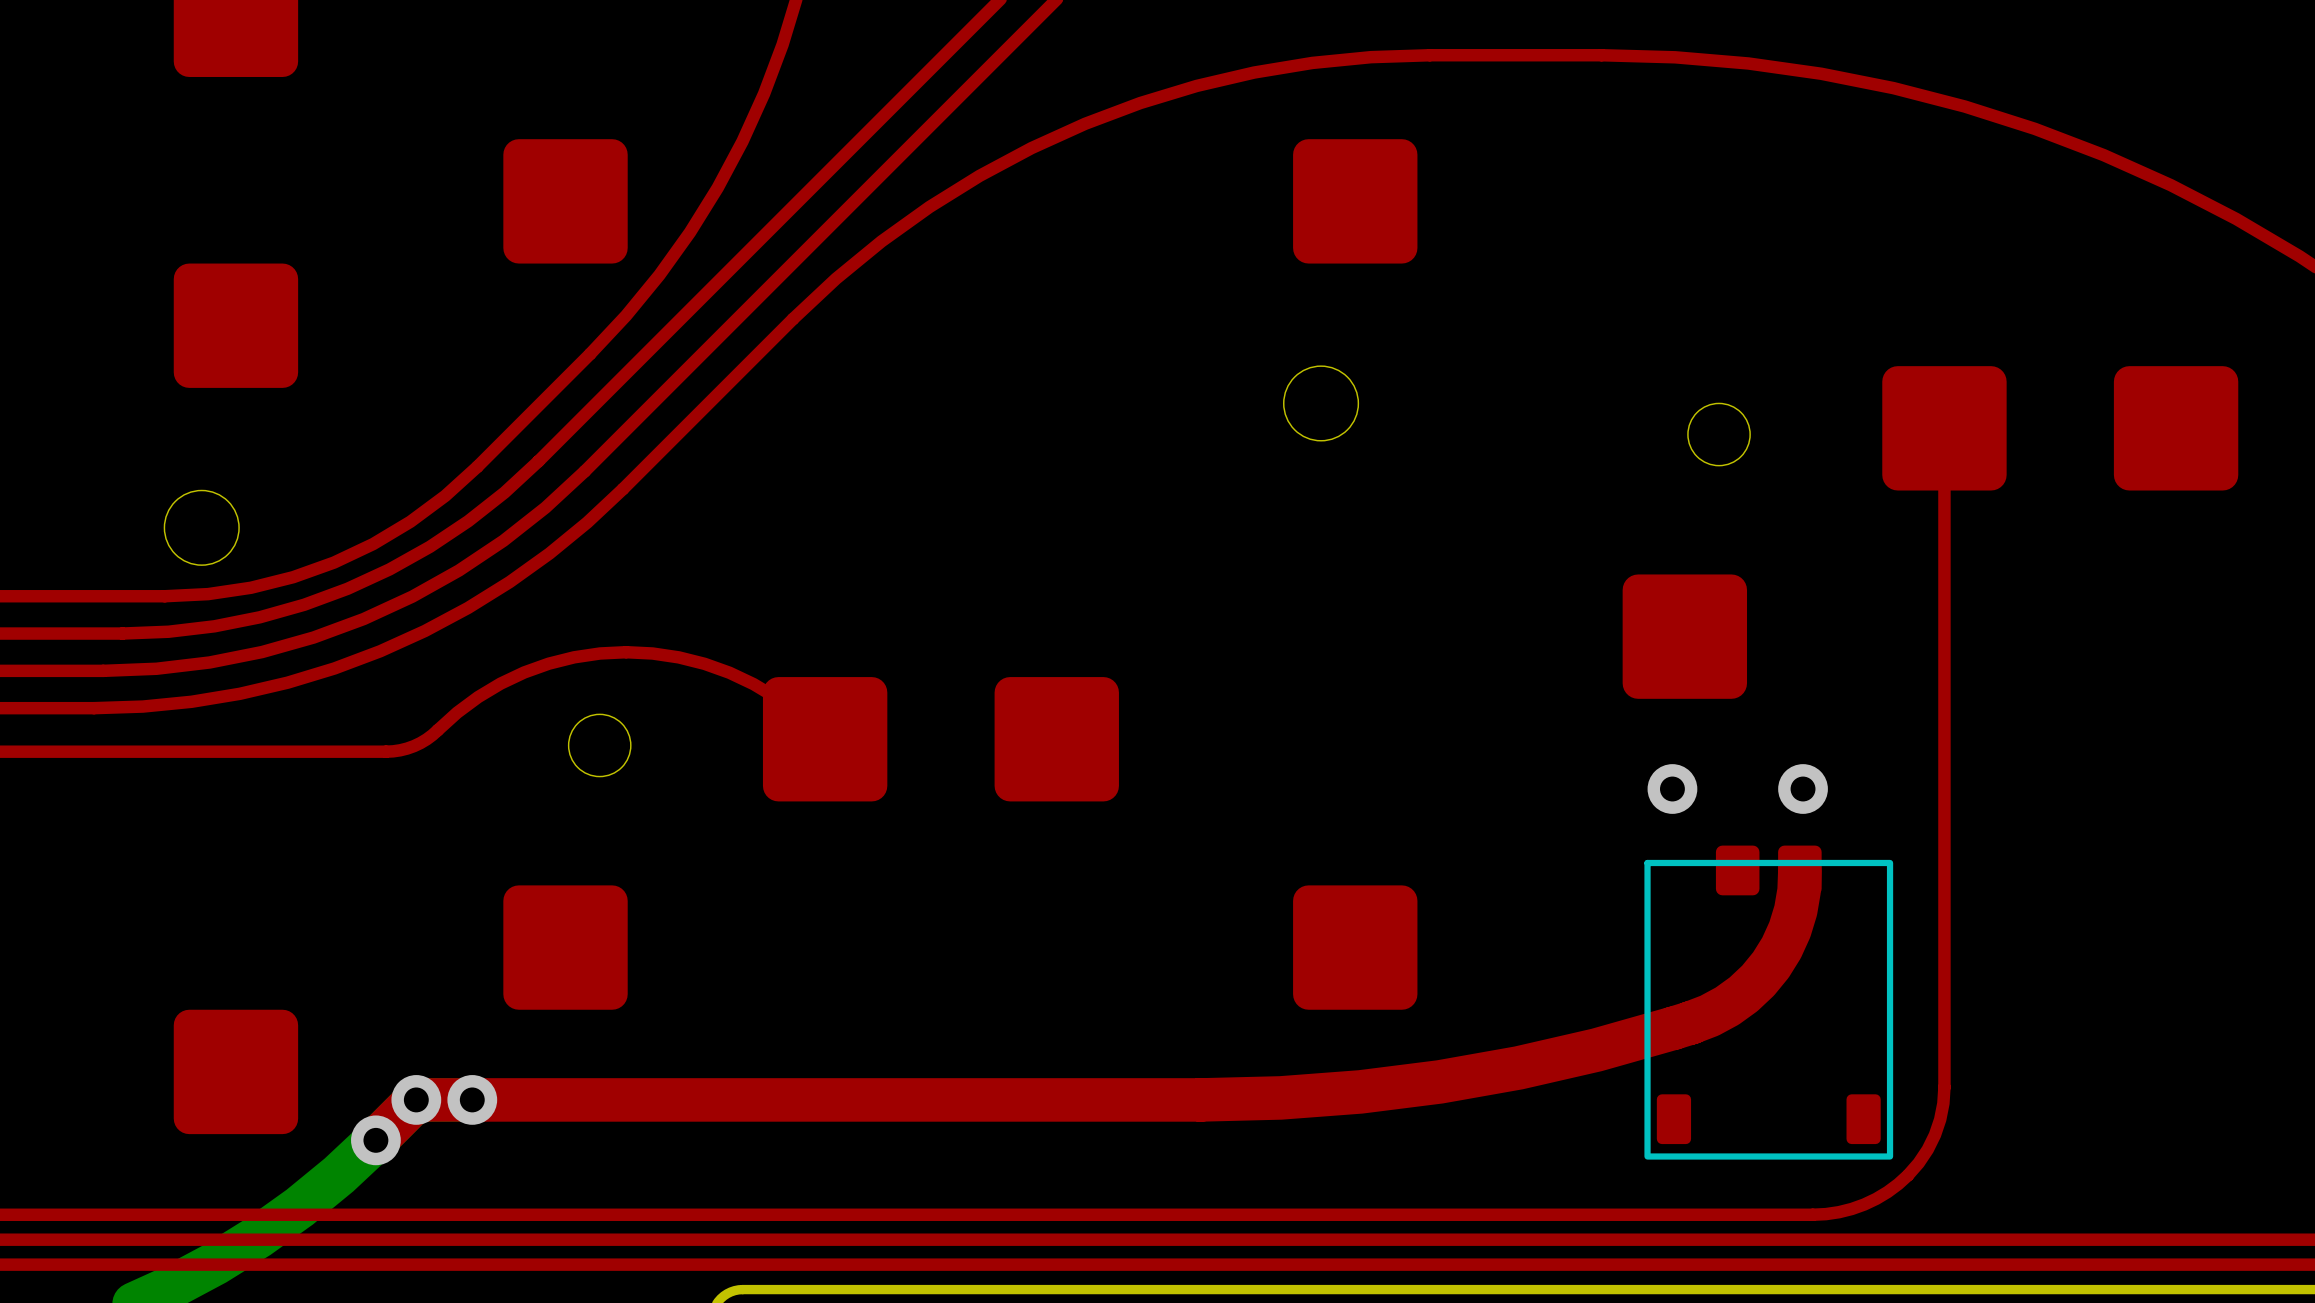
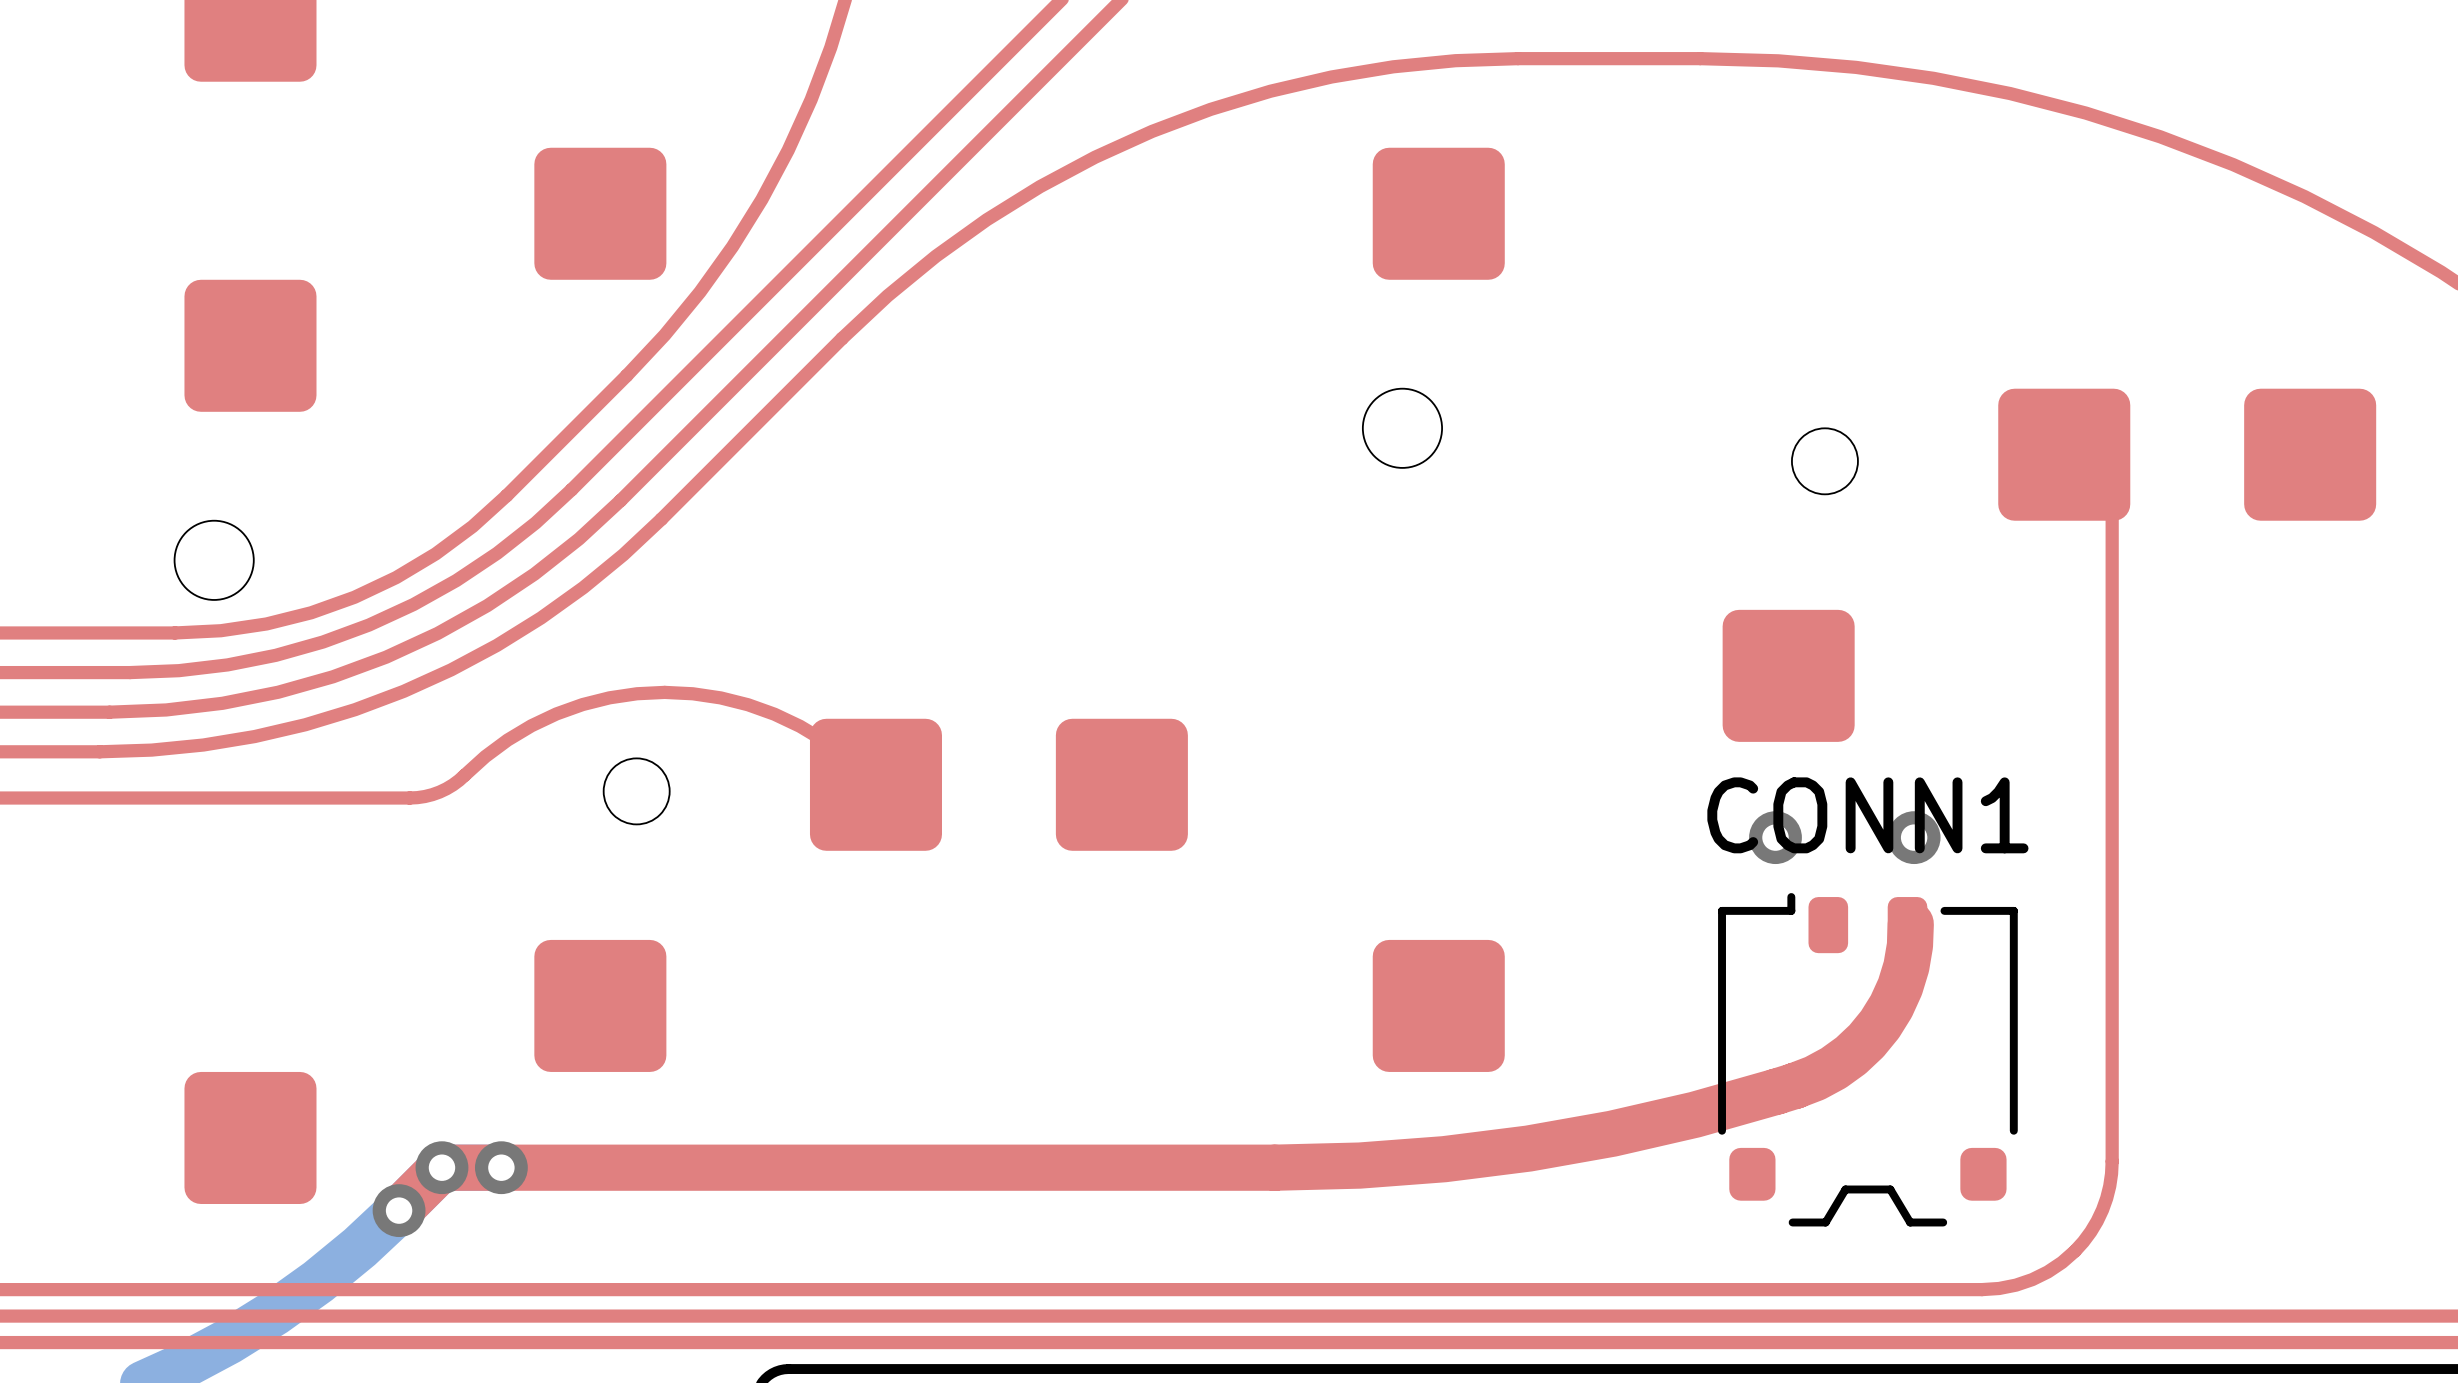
top track: (1944, 428) (1943, 1103) (1934, 1134) (1927, 1149) (1918, 1163) (1898, 1184) (1864, 1204) (1839, 1212) (1812, 1214) -> (2064, 454) (2112, 502) (2112, 1161) (2109, 1186) (2102, 1209) (2090, 1231) (2075, 1251) (2047, 1271) (2016, 1285) (1999, 1288) (1924, 1289)
CONN1: none -> (1867, 1059)
part: (1768, 1002) -> none

